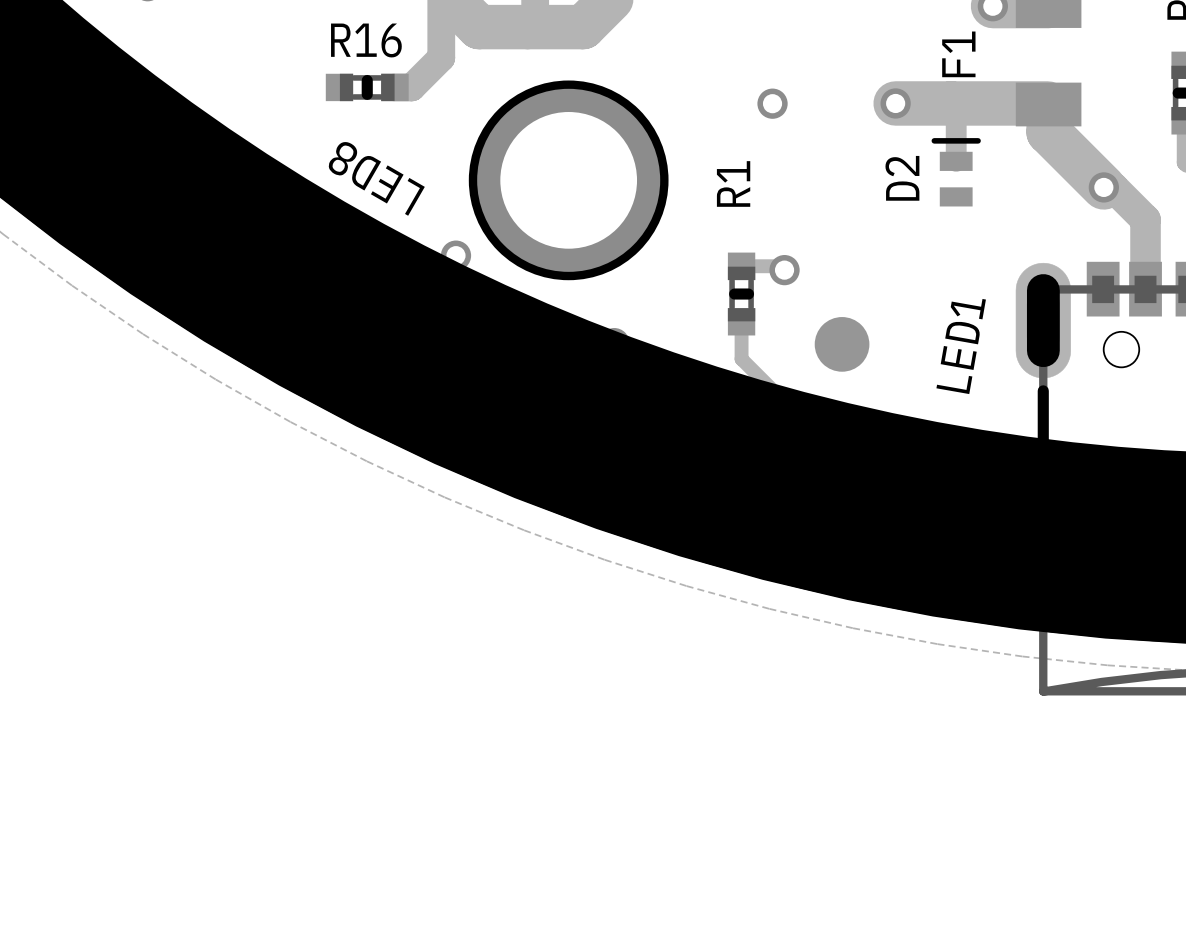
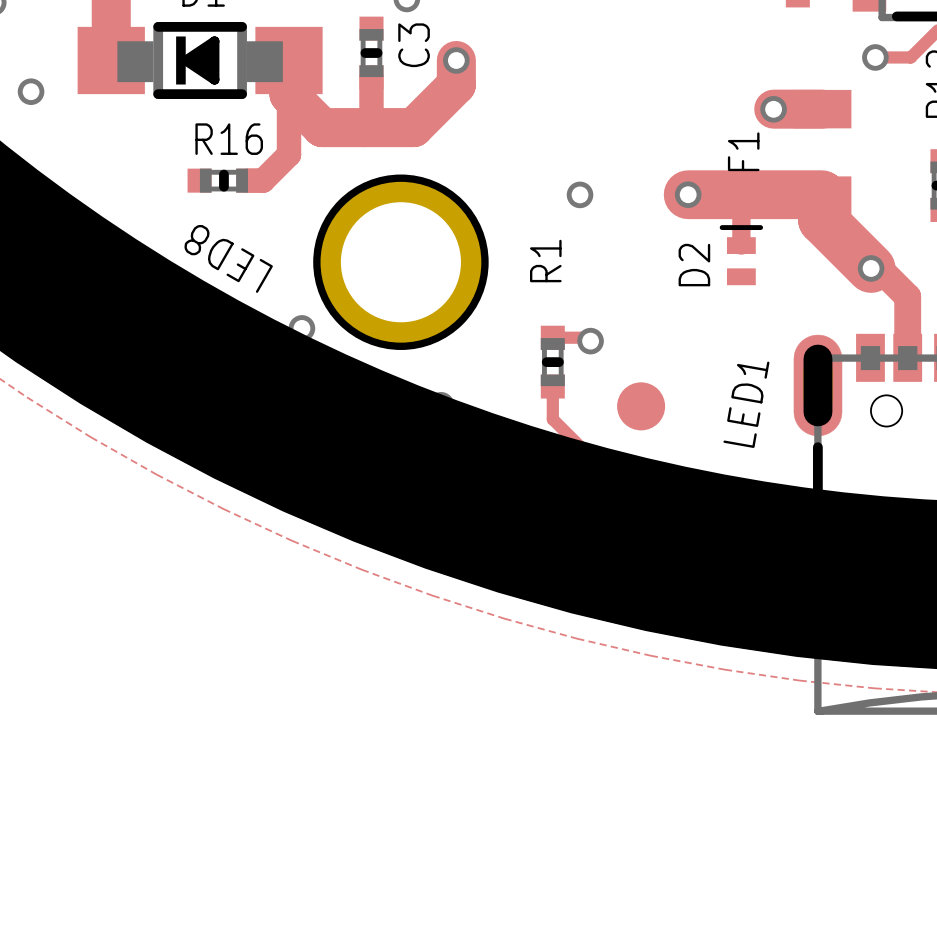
track width: thin (895, 103) (1047, 103) -> thick (688, 194) (821, 194)
track width: thin (1048, 104) (1048, 132) (1103, 187) -> thick (822, 195) (822, 219) (871, 268)

